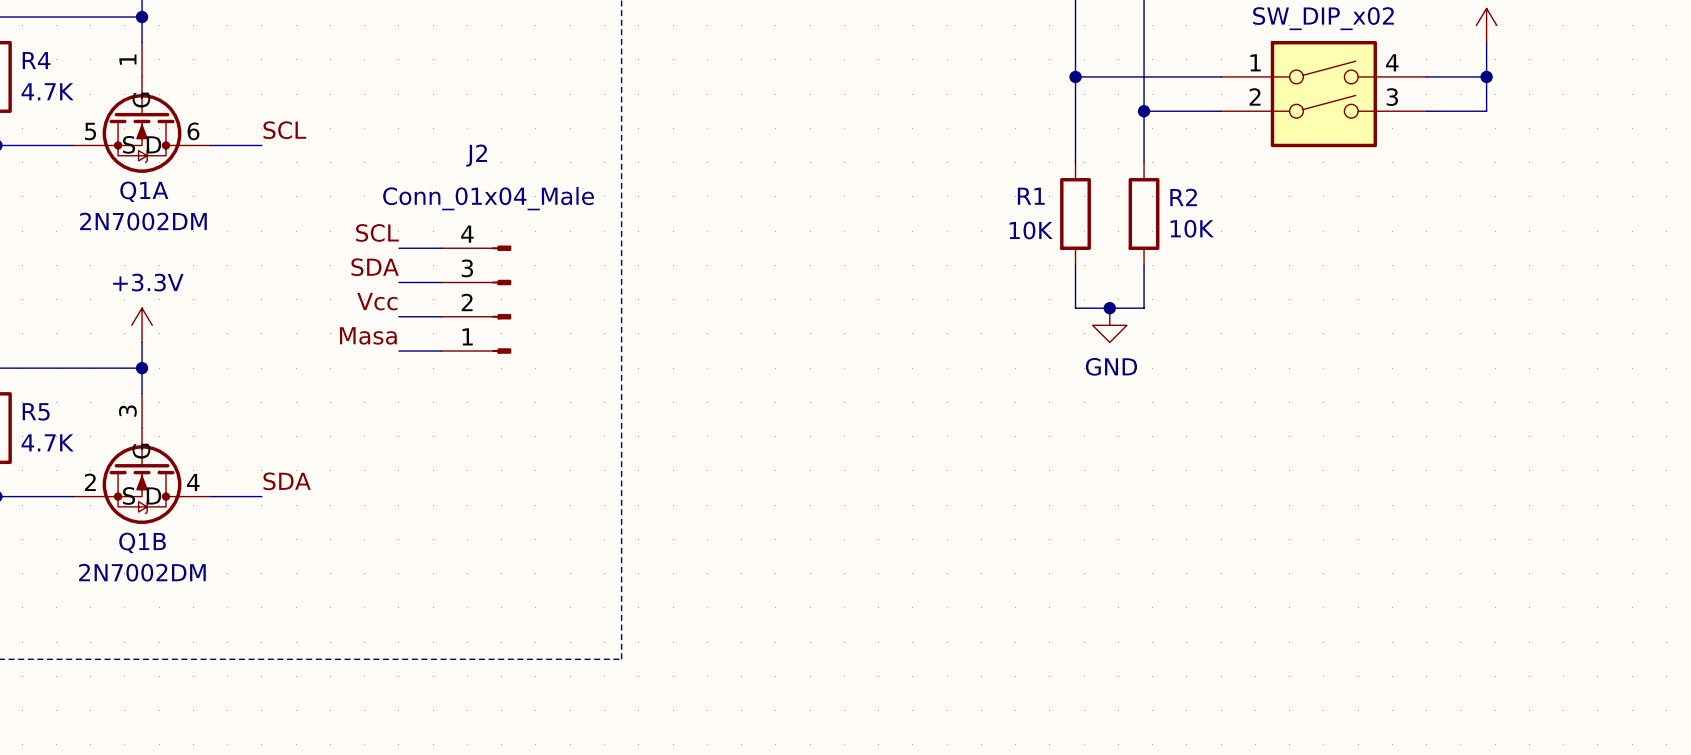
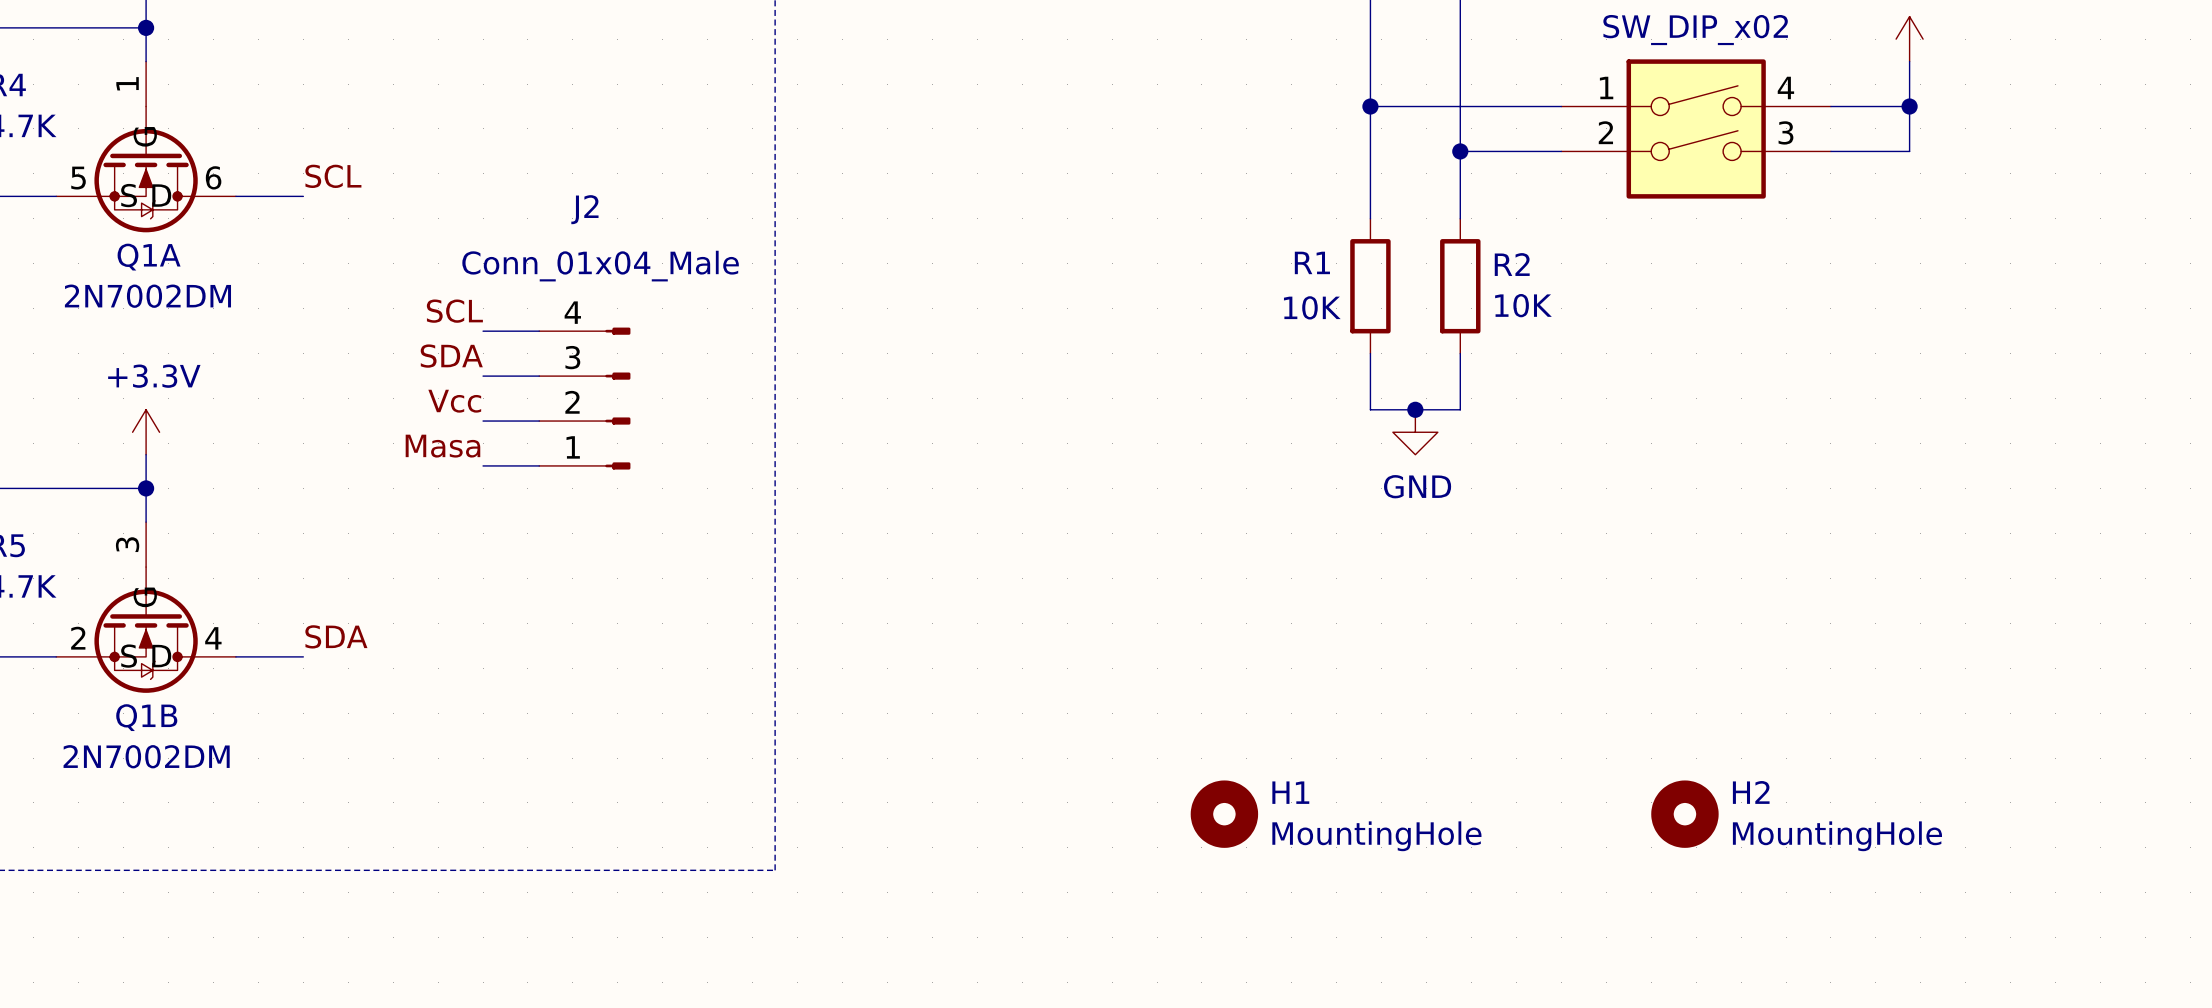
H1: none -> MountingHole (1224, 814)
H2: none -> MountingHole (1684, 814)

